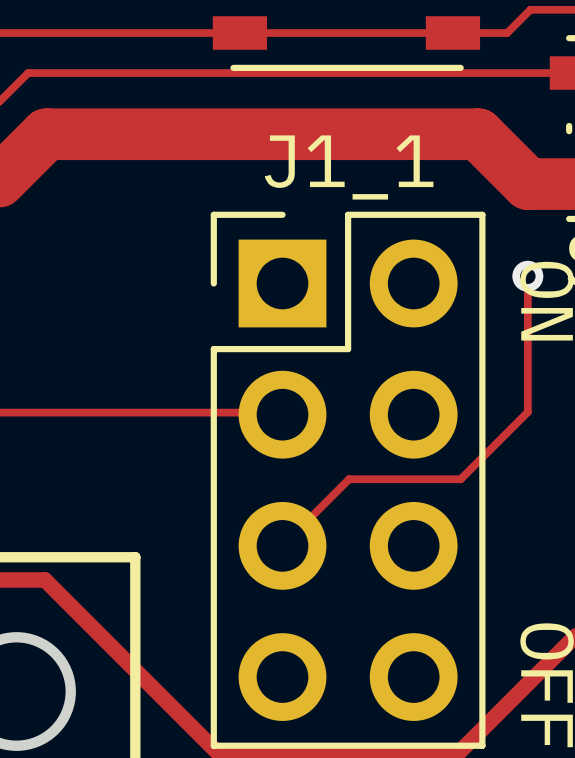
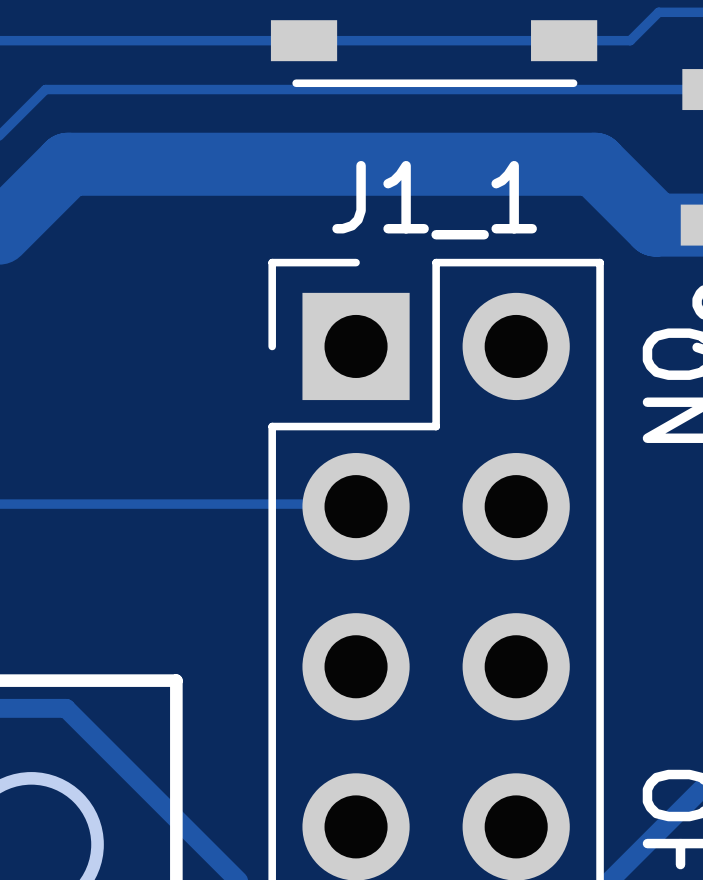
track: (527, 276) (527, 412) (460, 479) (349, 479) (282, 545) -> none
via: (527, 276) -> none

